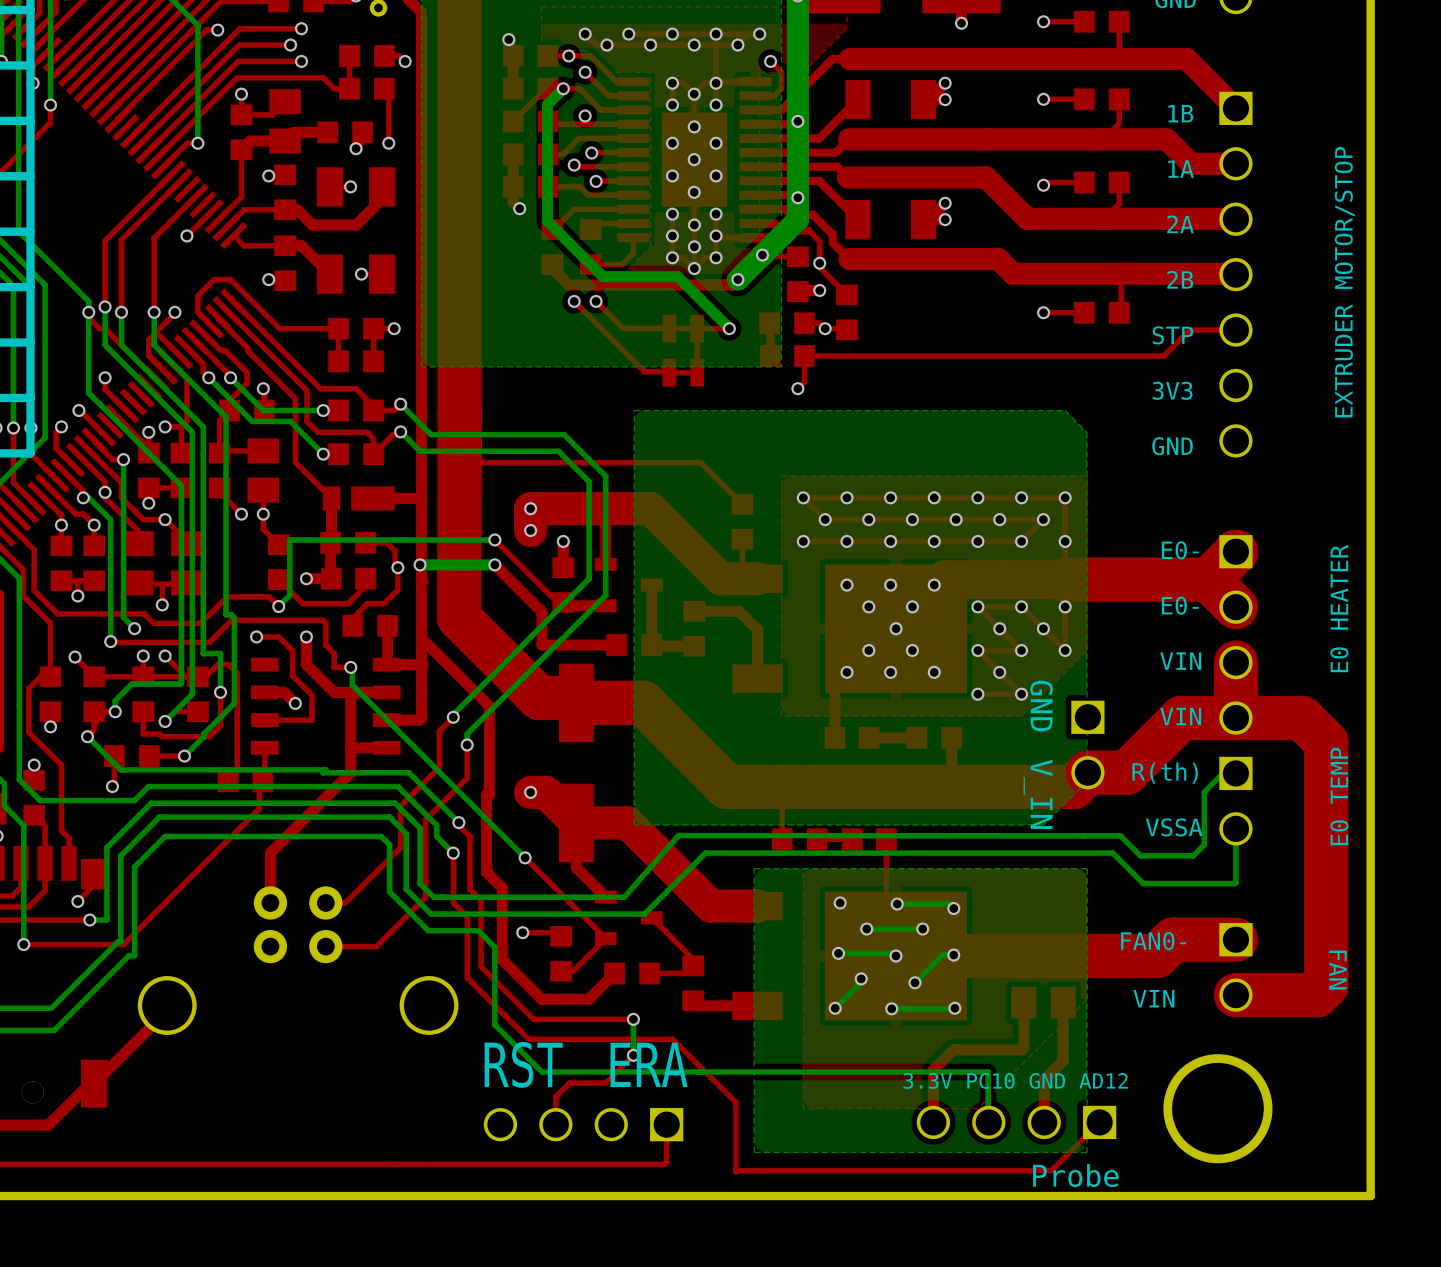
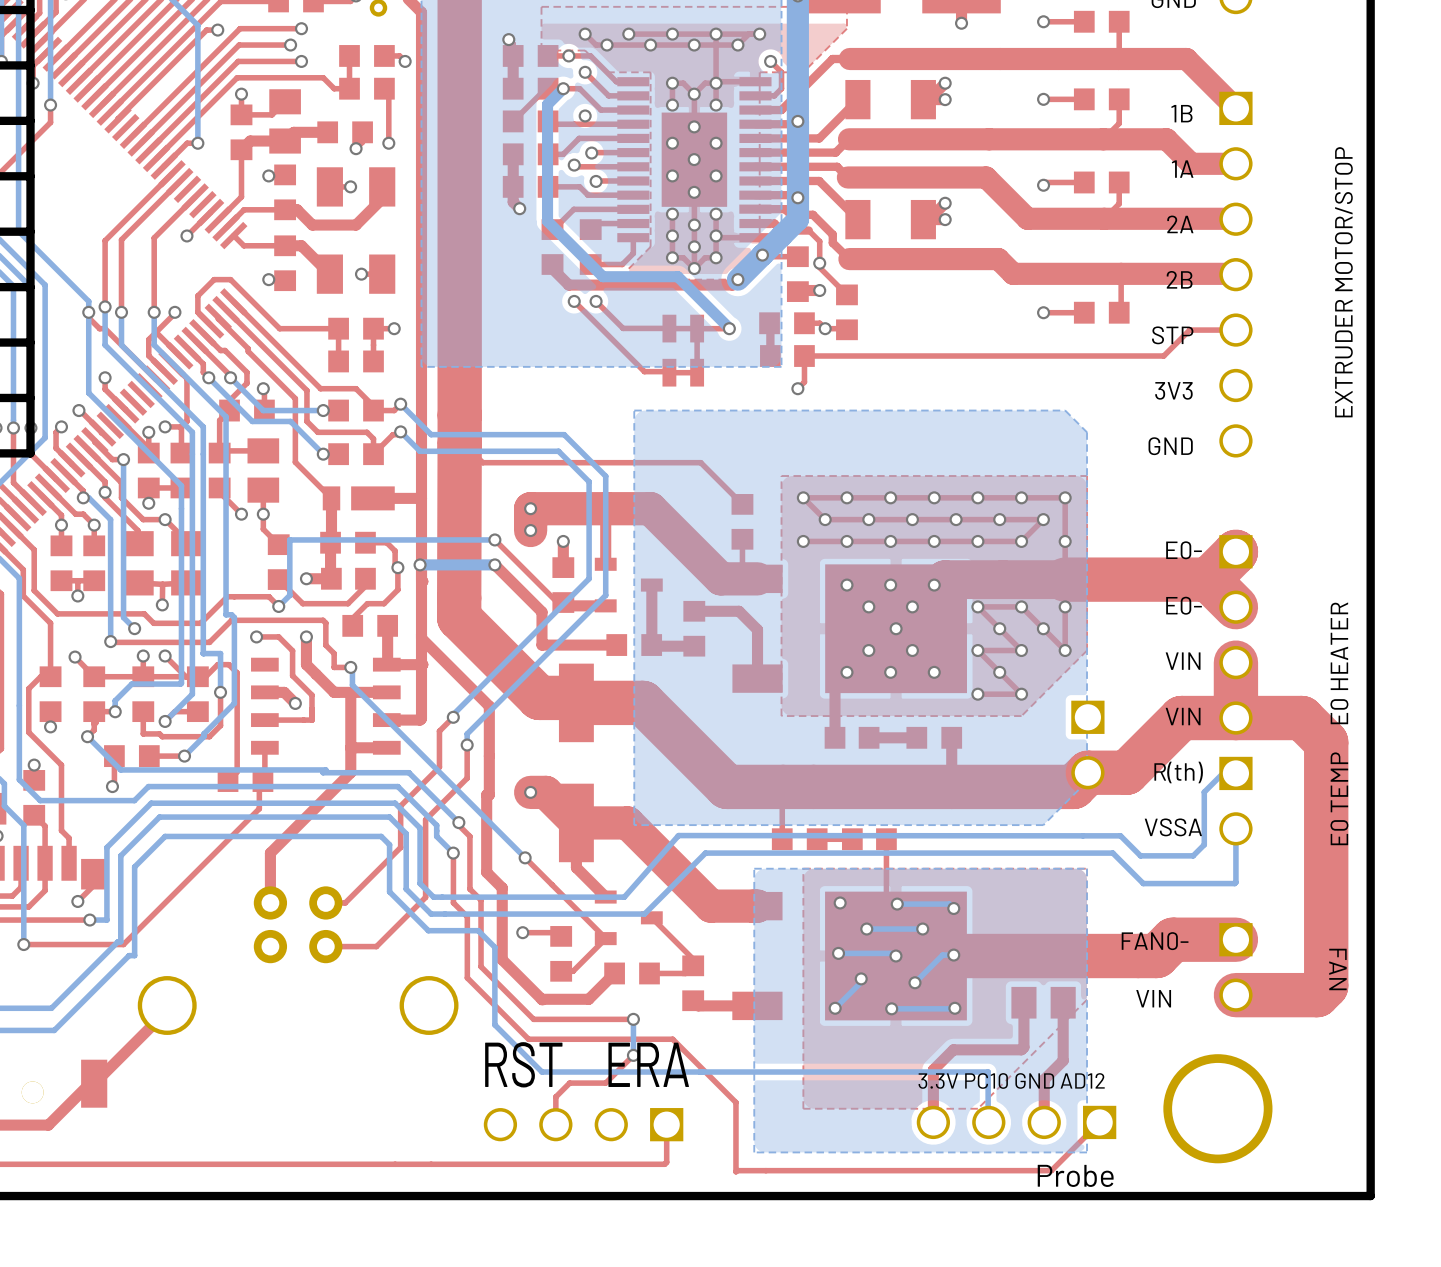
text: GND (1041, 706) -> none
text: V_IN (1038, 794) -> none

